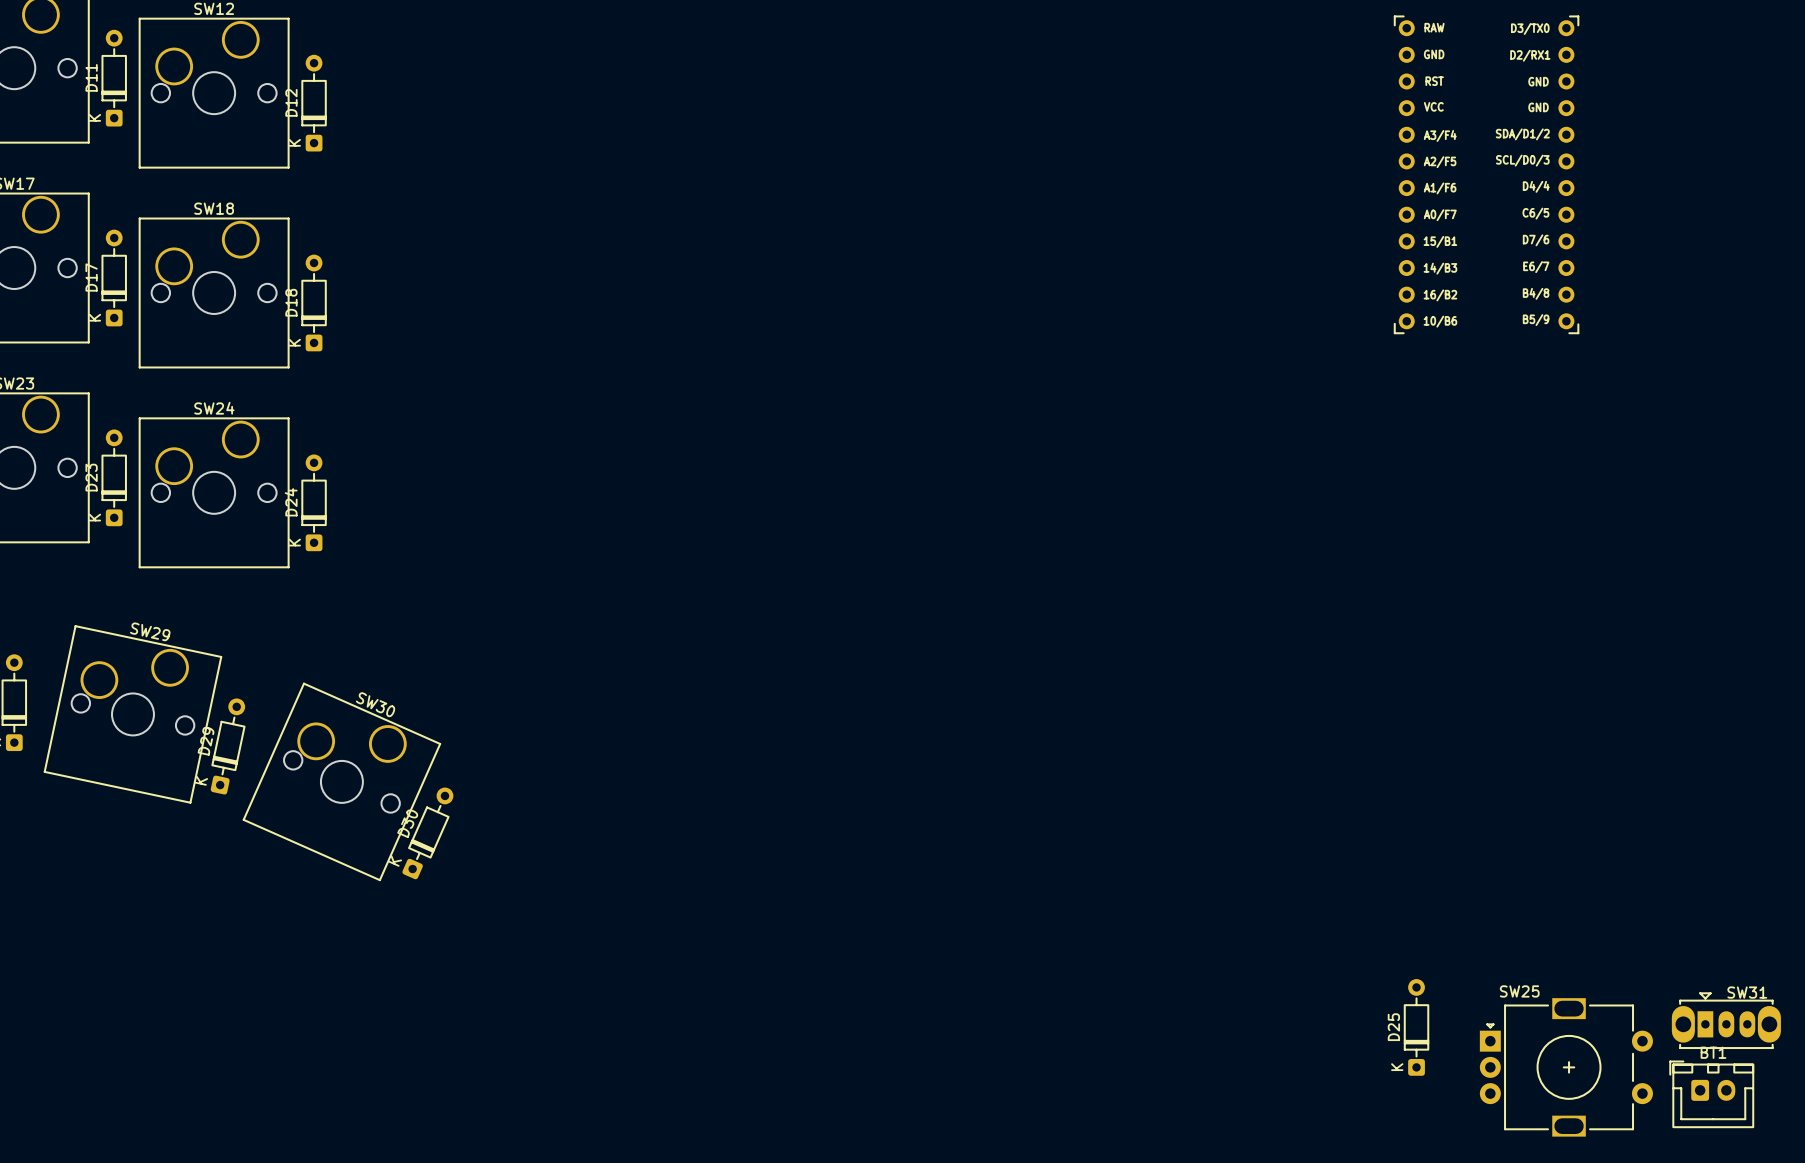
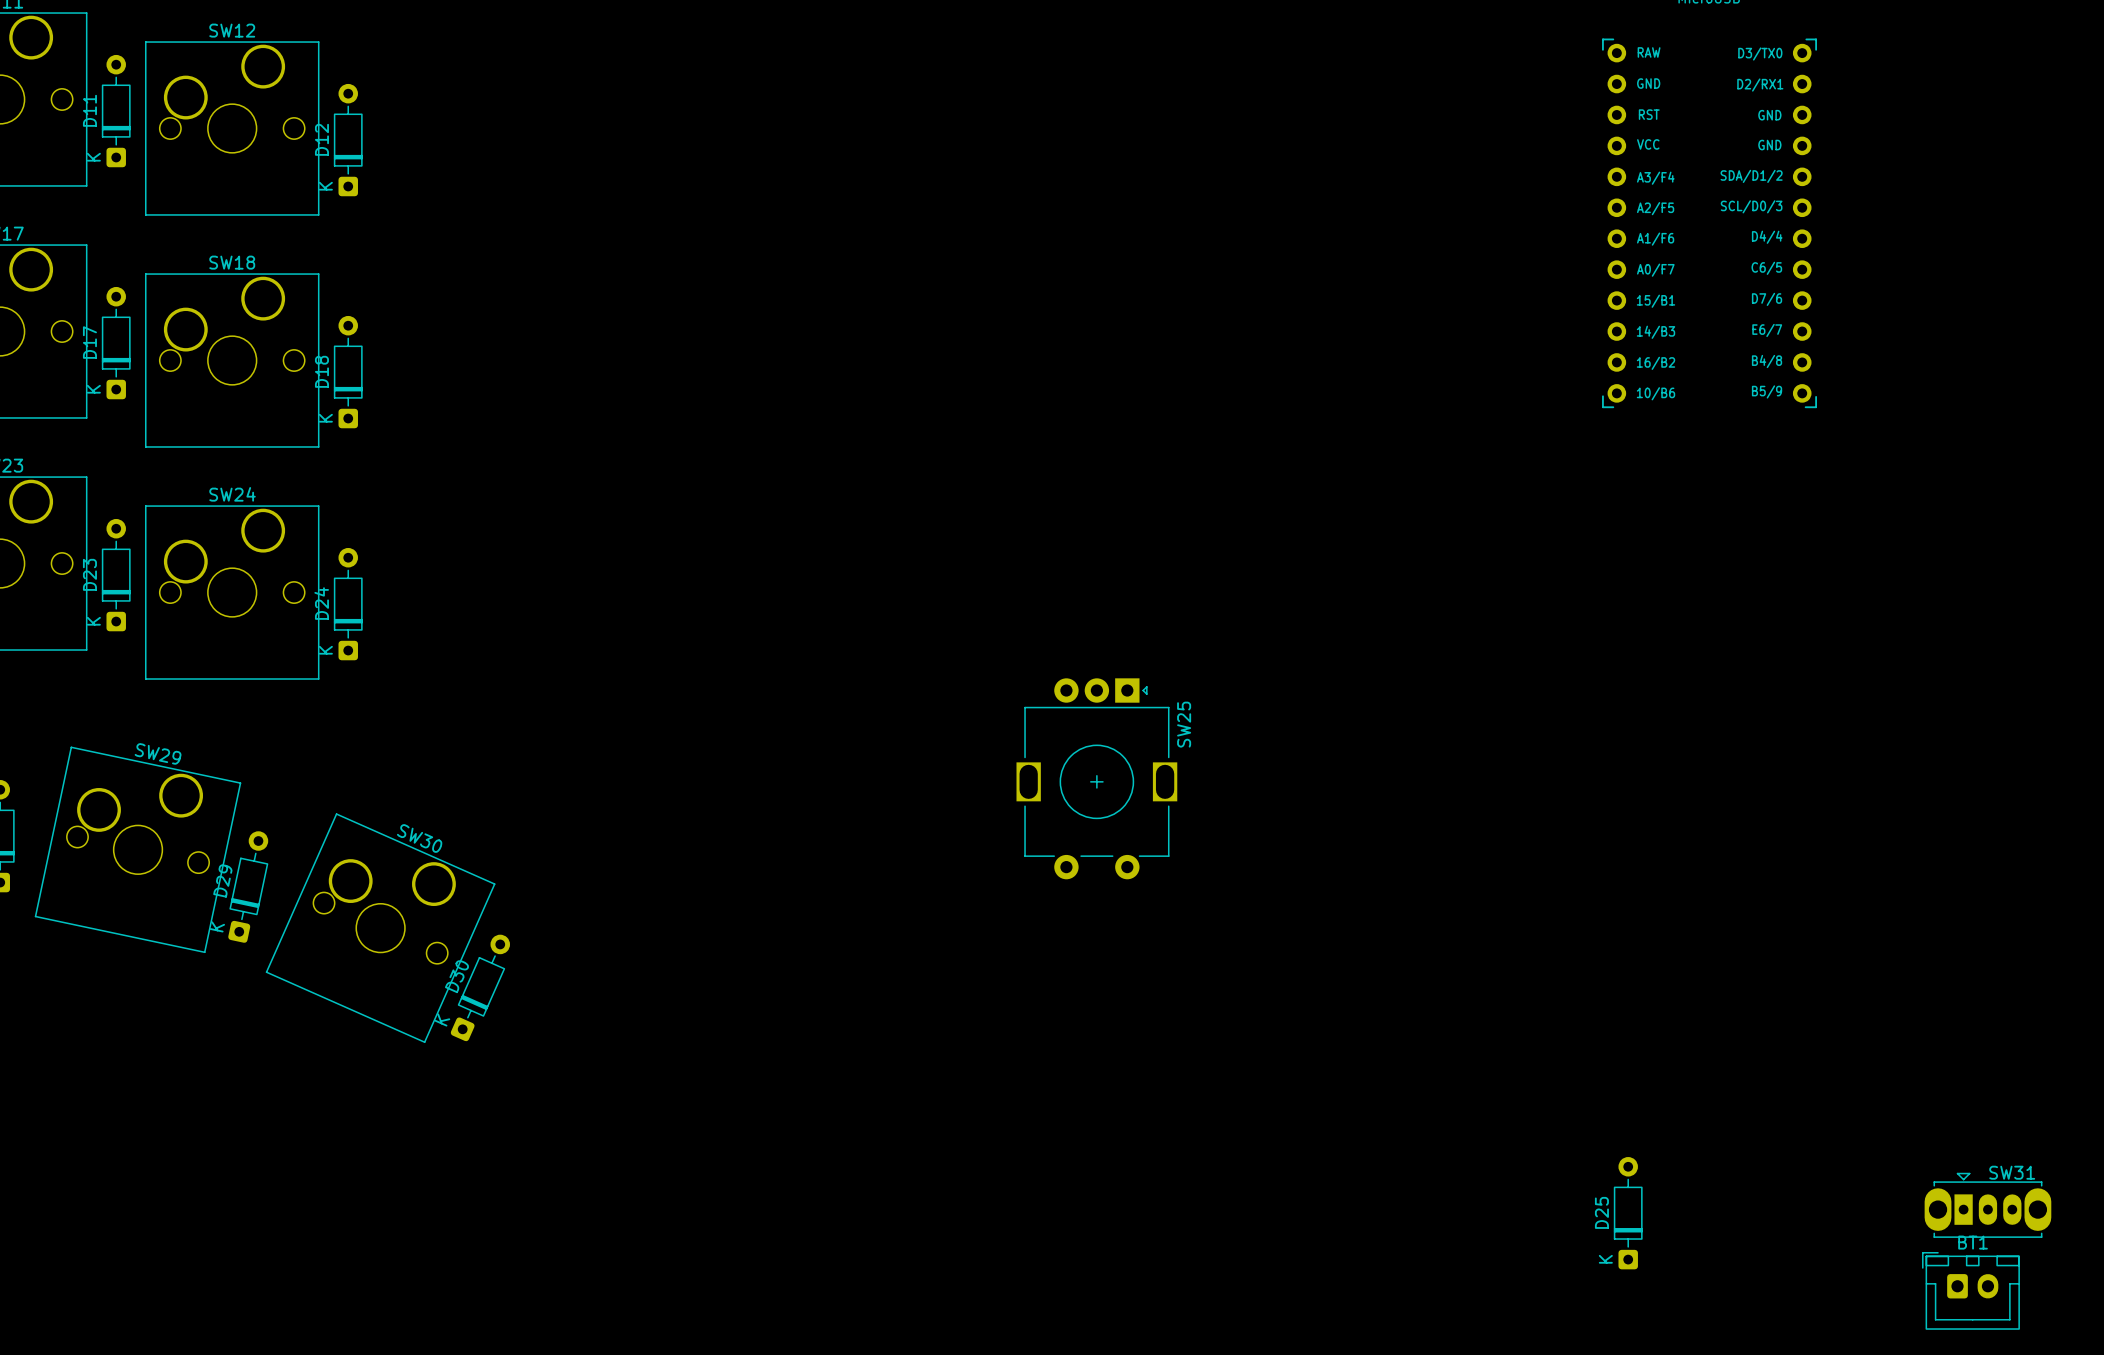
SW25 rotation: 0° (1566, 1067) -> 90° clockwise (1096, 778)
SW25 position: (1566, 1067) -> (1096, 778)

